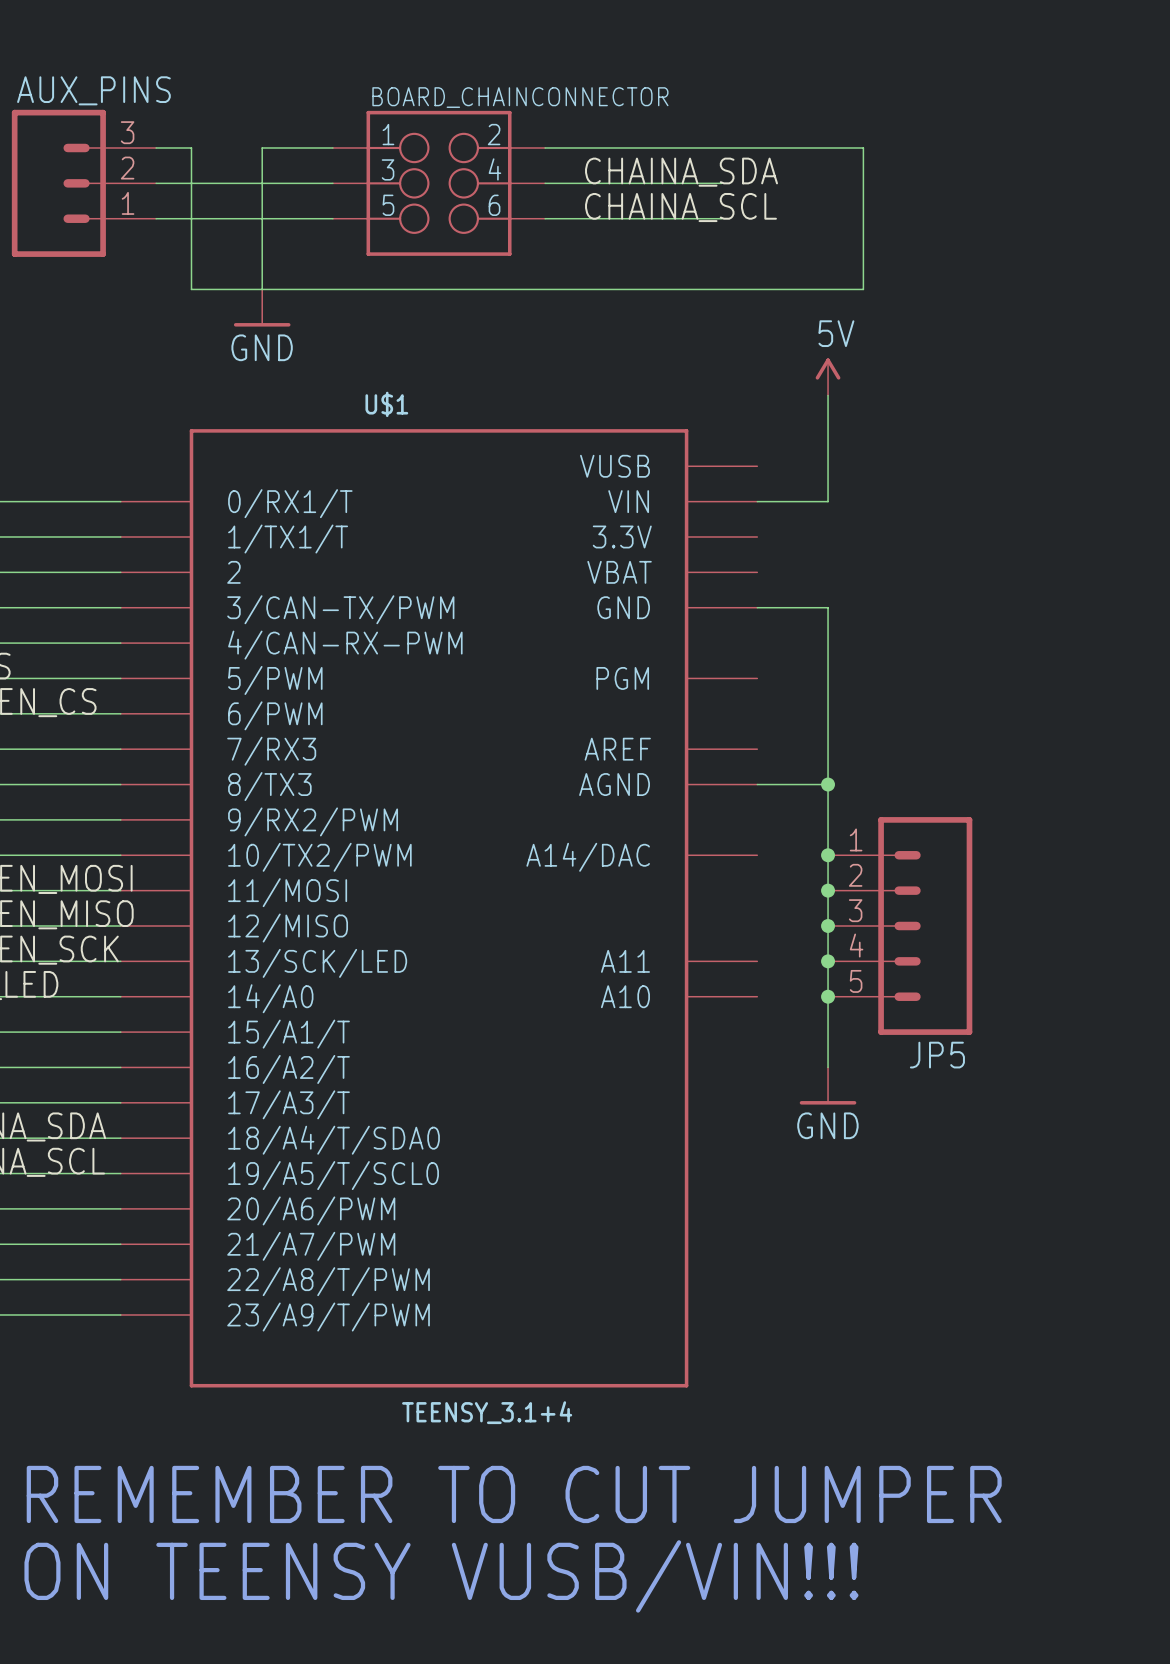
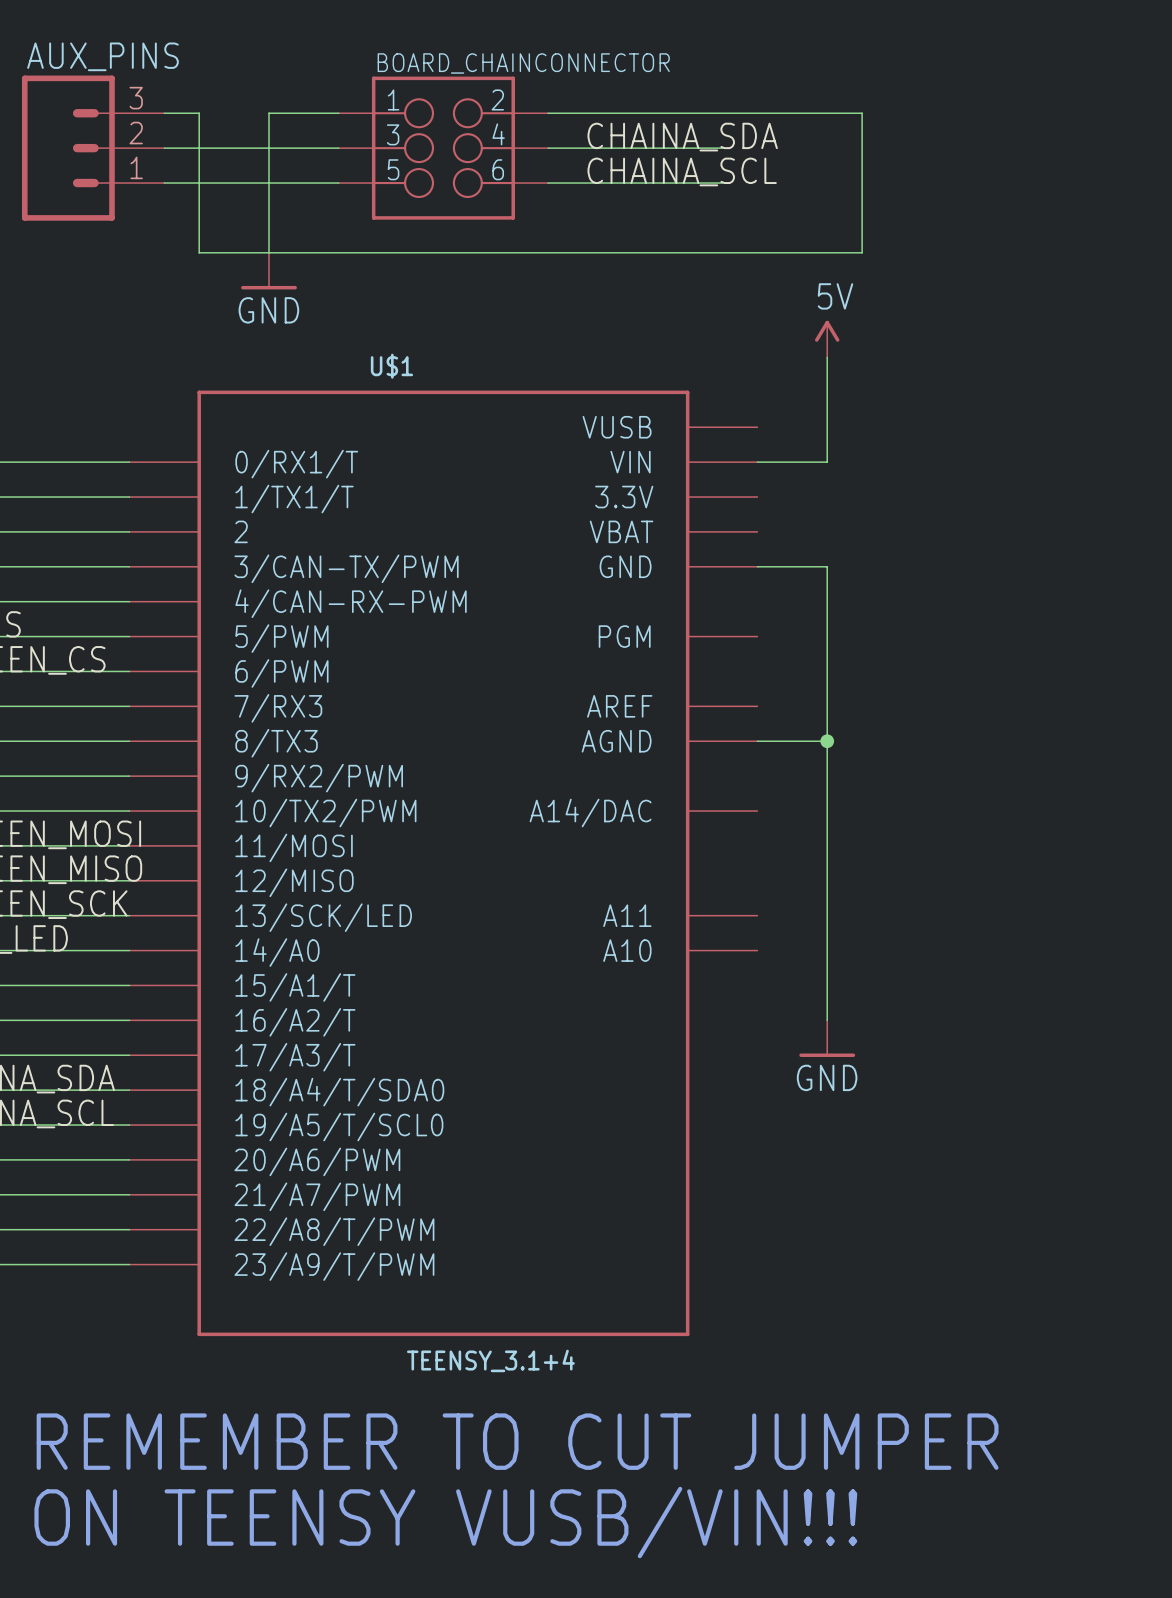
junction: (828, 855) -> none
junction: (828, 890) -> none
junction: (828, 925) -> none
JP5: (900, 925) -> none
junction: (828, 961) -> none
junction: (828, 996) -> none

